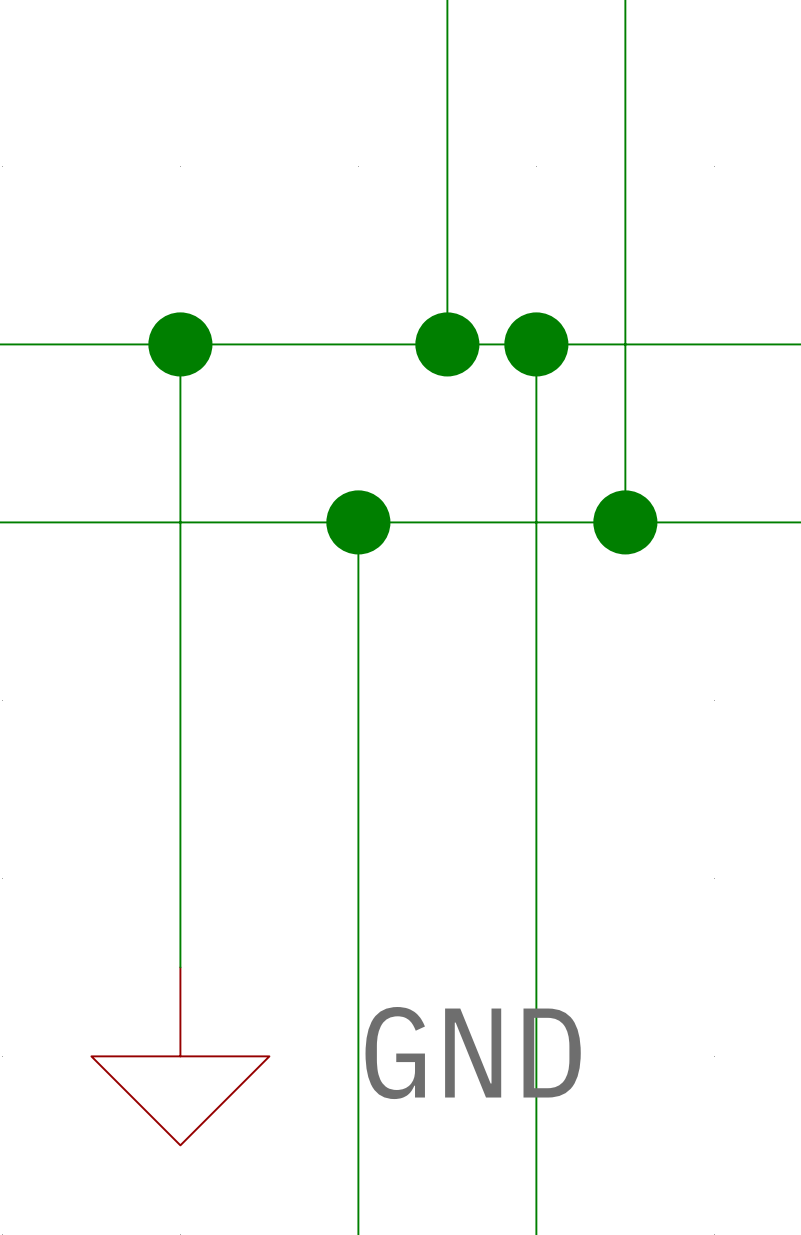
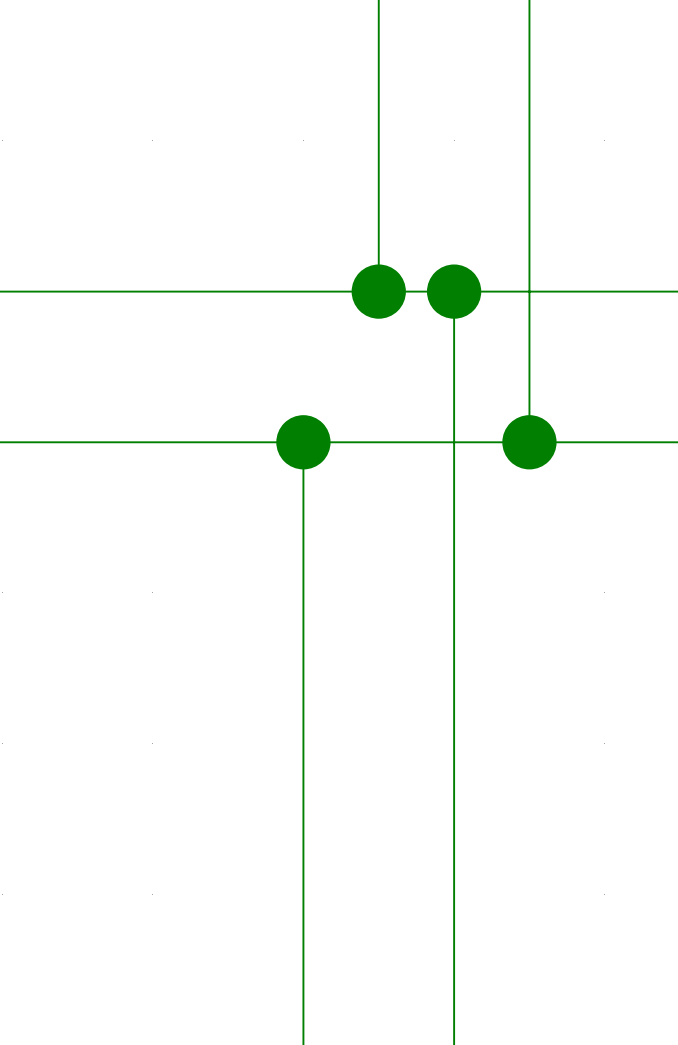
wire: (180, 344) (180, 967) -> none
junction: (180, 344) -> none
power symbol: GND (180, 1056) -> none

